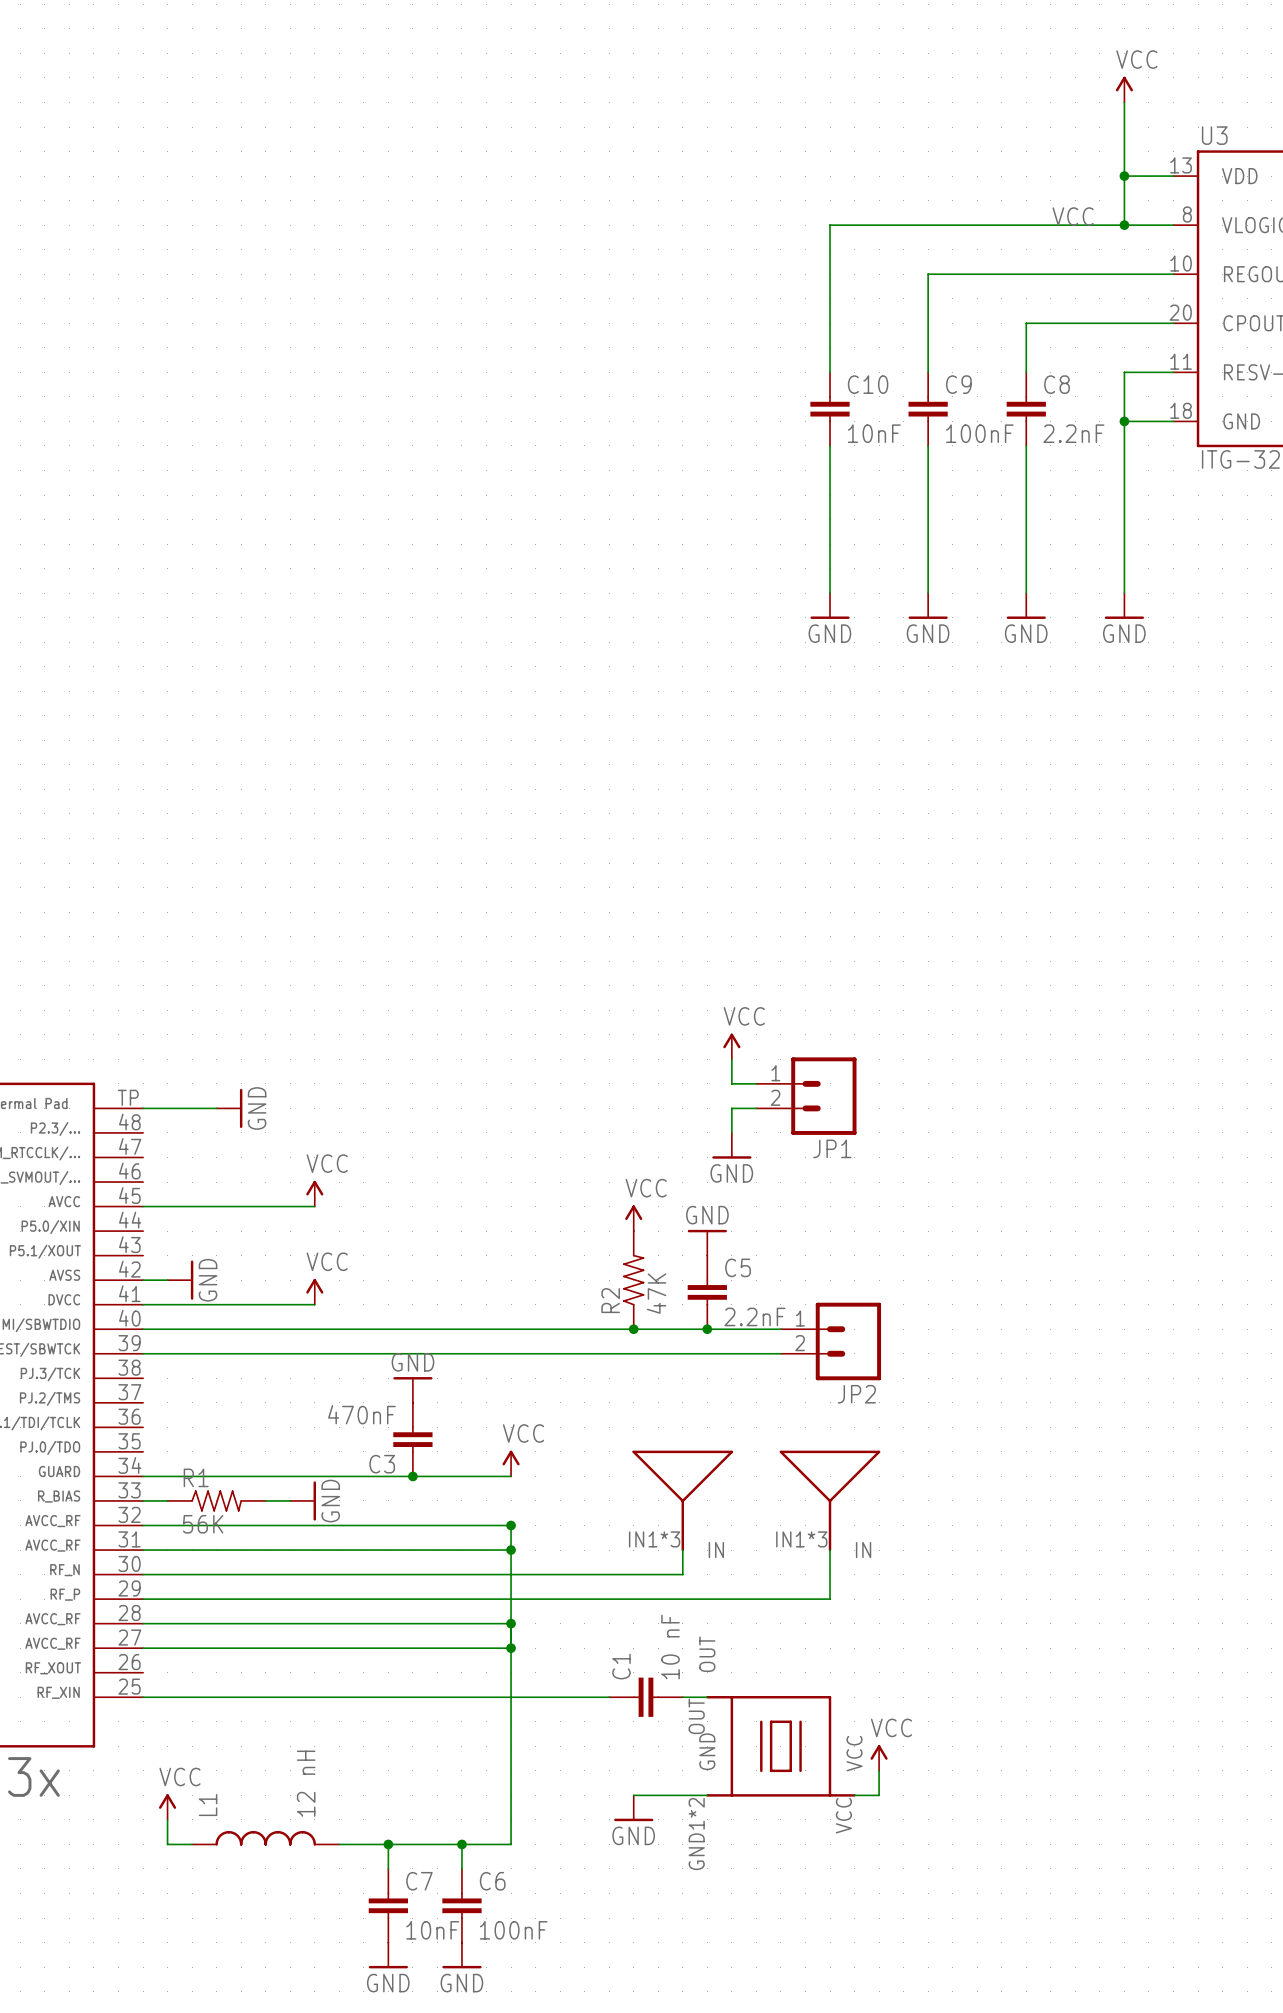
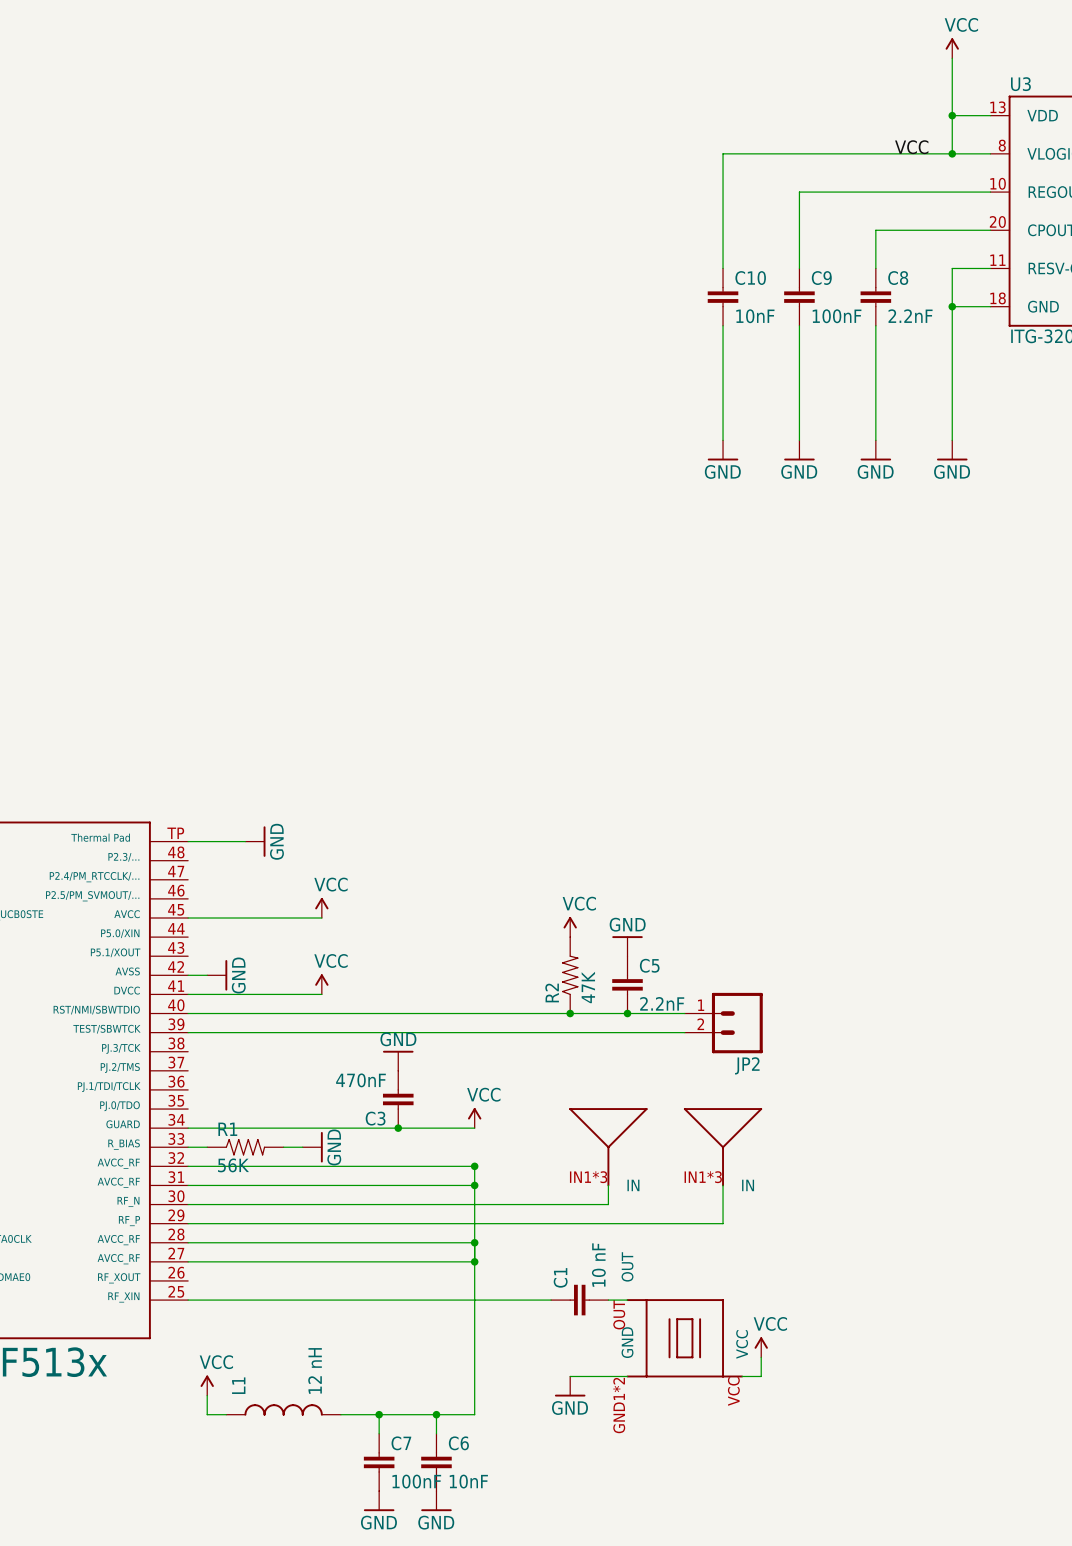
power symbol: VCC (731, 1046) -> none
wire: (731, 1059) (731, 1083) (756, 1083) -> none
JP1: (806, 1096) -> none
wire: (756, 1108) (731, 1108) (731, 1132) -> none
power symbol: GND (731, 1145) -> none
C7 value: 10nF (432, 1930) -> 100nF (416, 1481)
C6 value: 100nF (513, 1930) -> 10nF (468, 1481)

